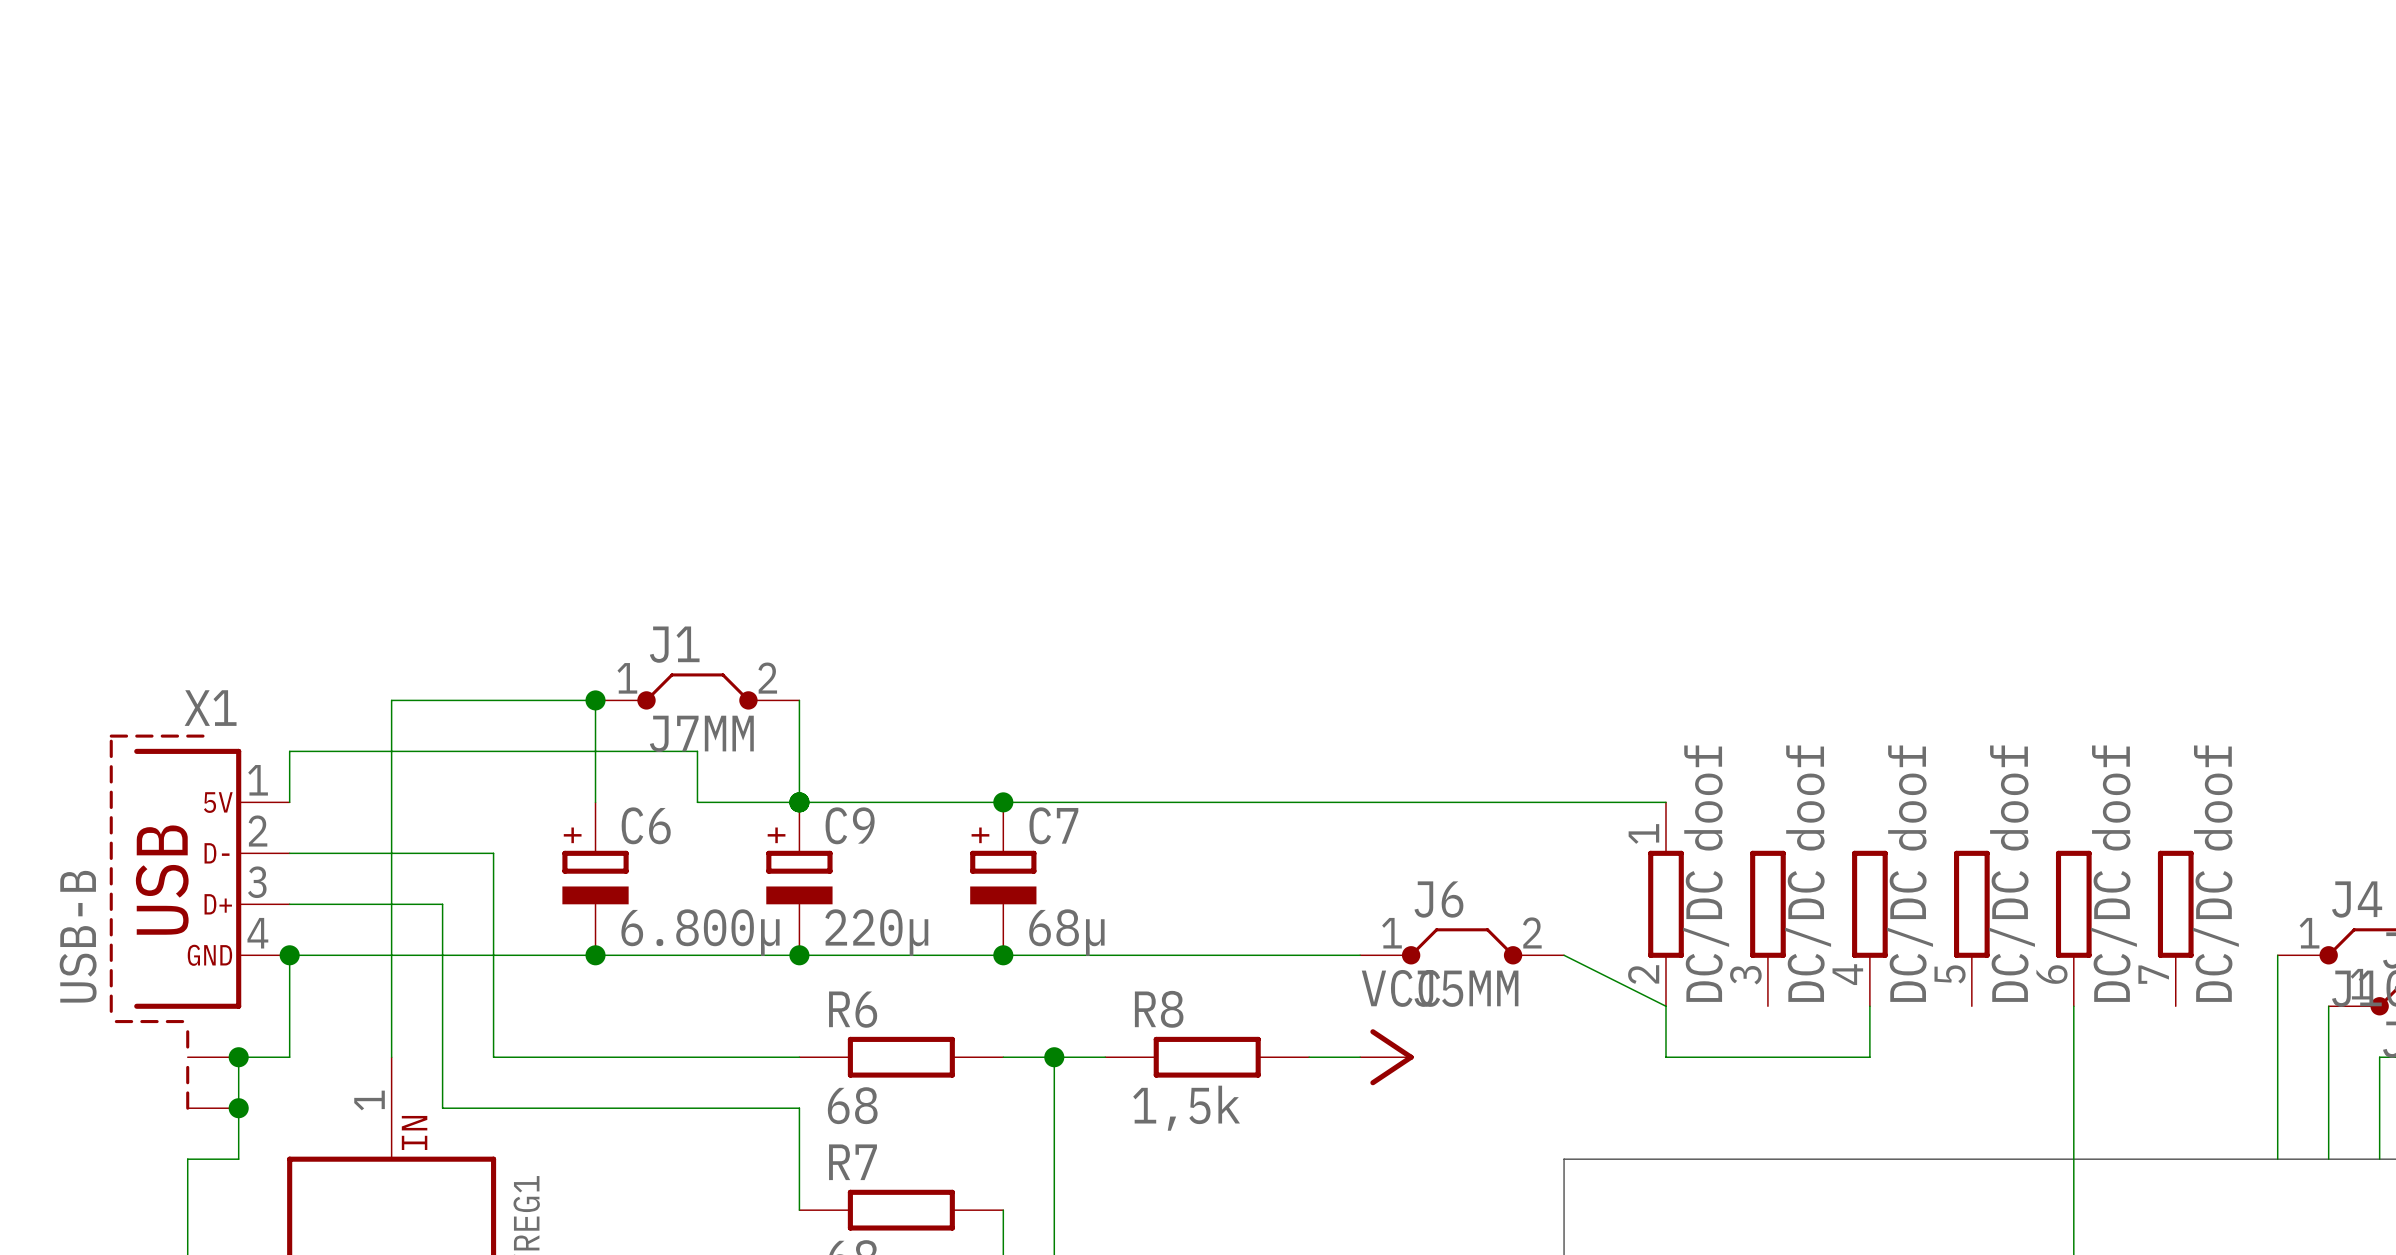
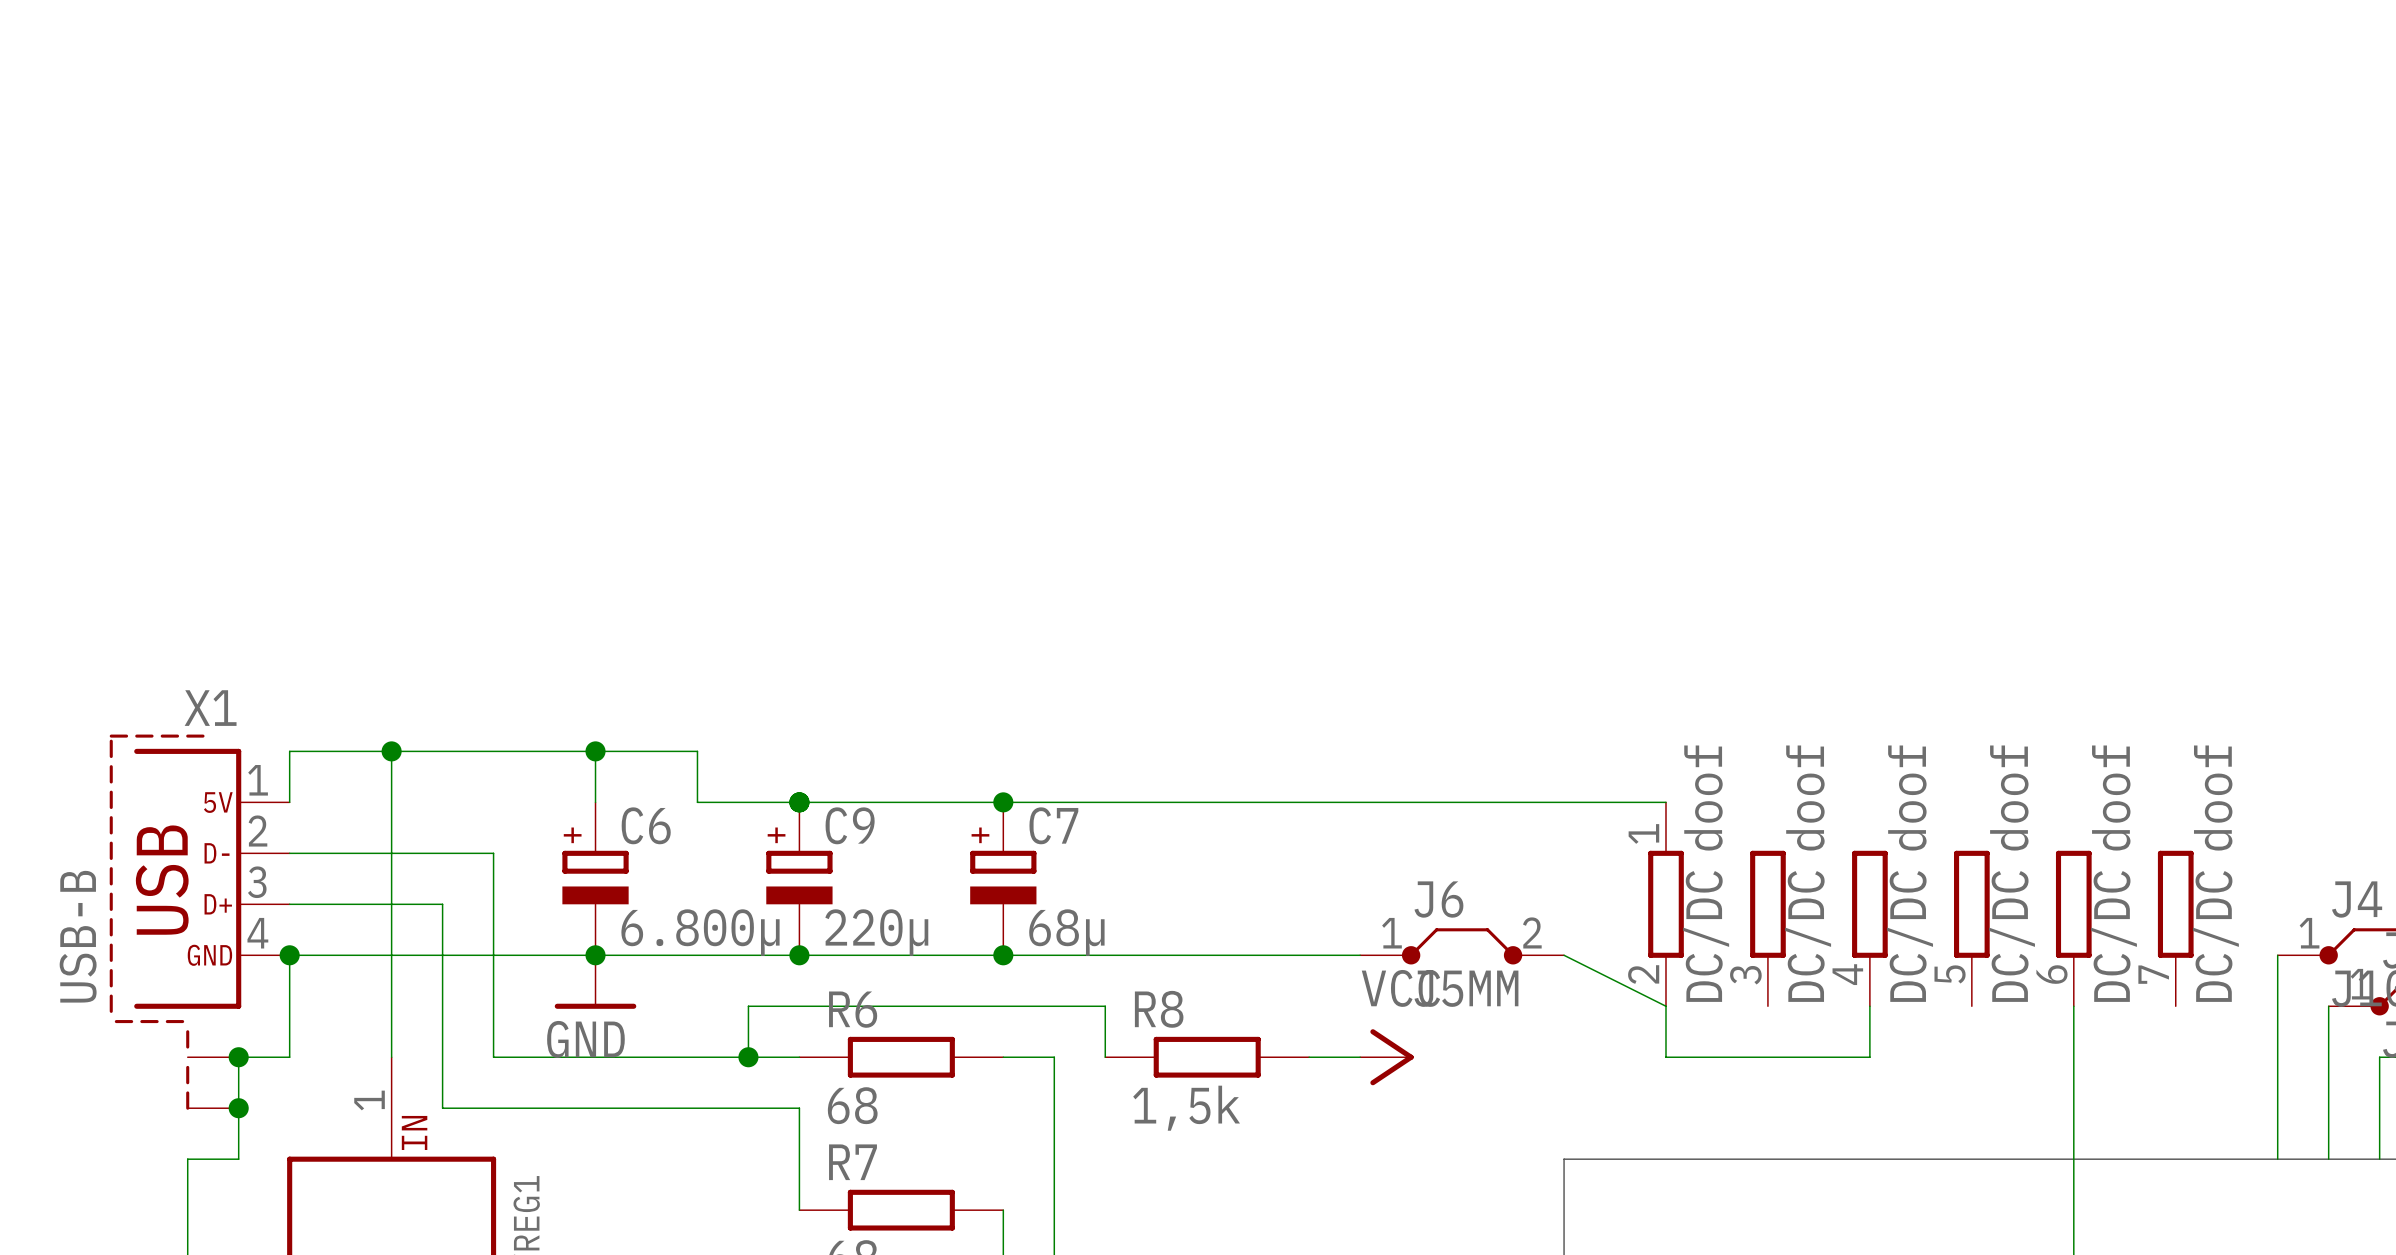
J1: J7MM (697, 691) -> none
junction position: (595, 700) -> (595, 751)
wire: (799, 700) (799, 802) -> none
wire: (391, 751) (391, 700) (595, 700) (595, 751) -> none
junction: none -> (391, 751)
power symbol: none -> GND (595, 982)
junction: none -> (748, 1057)
wire: (1054, 1057) (1105, 1057) -> (748, 1057) (748, 1006) (1105, 1006) (1105, 1057)
junction: (1054, 1057) -> none

